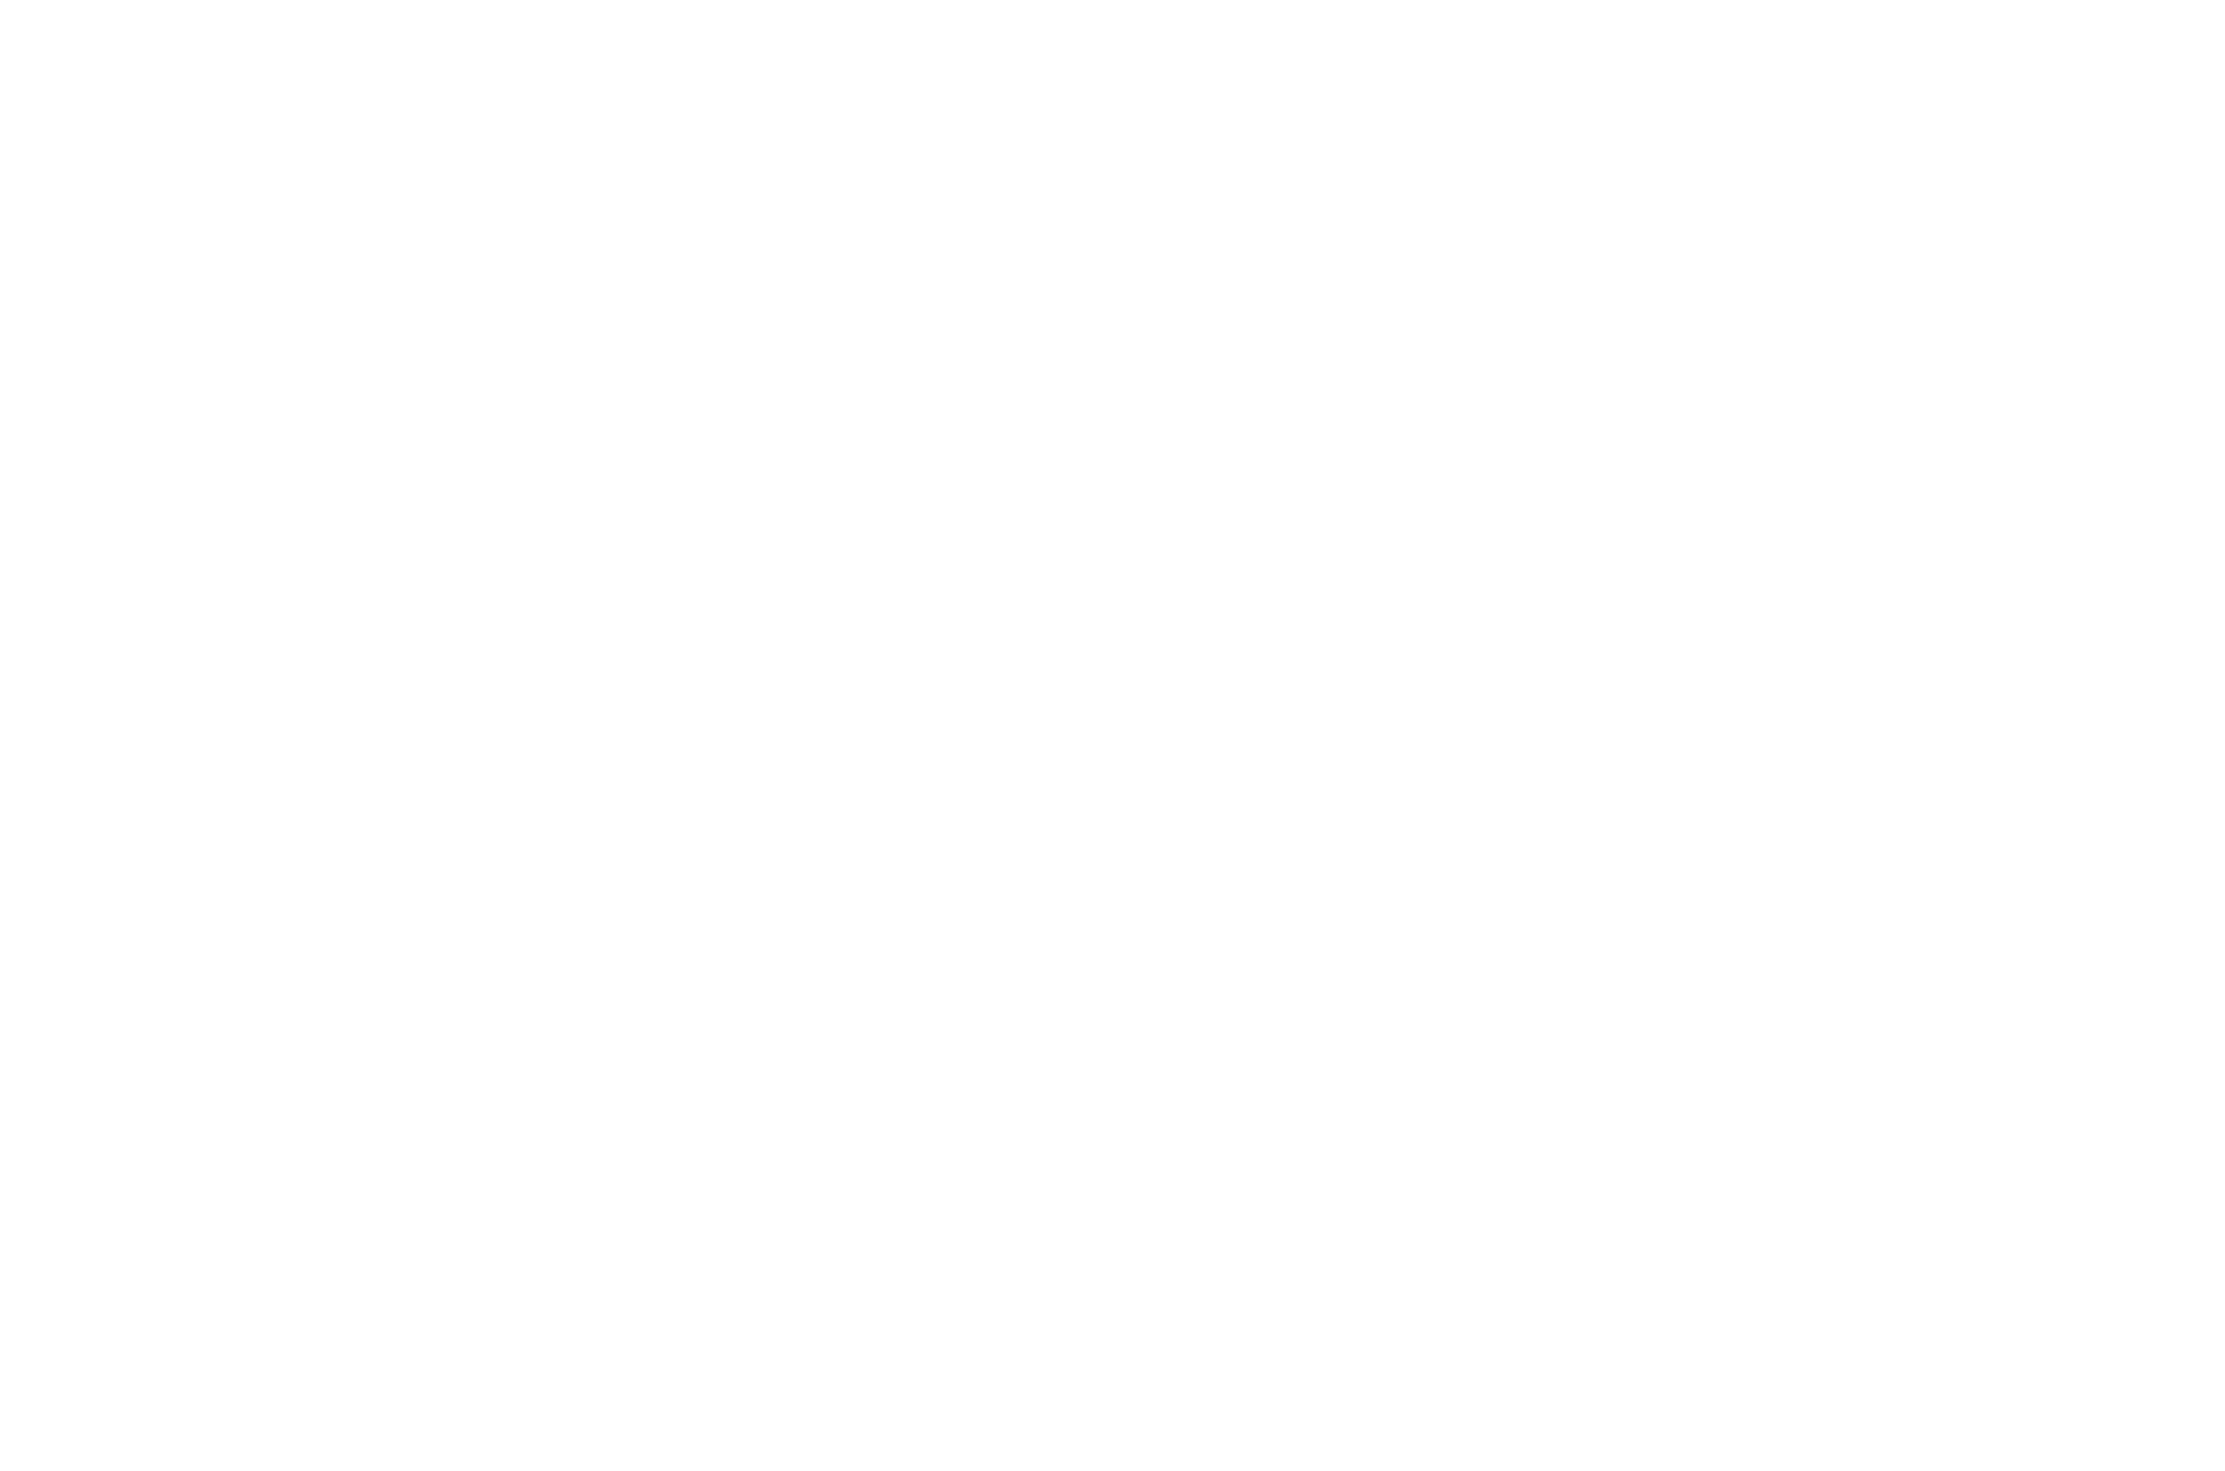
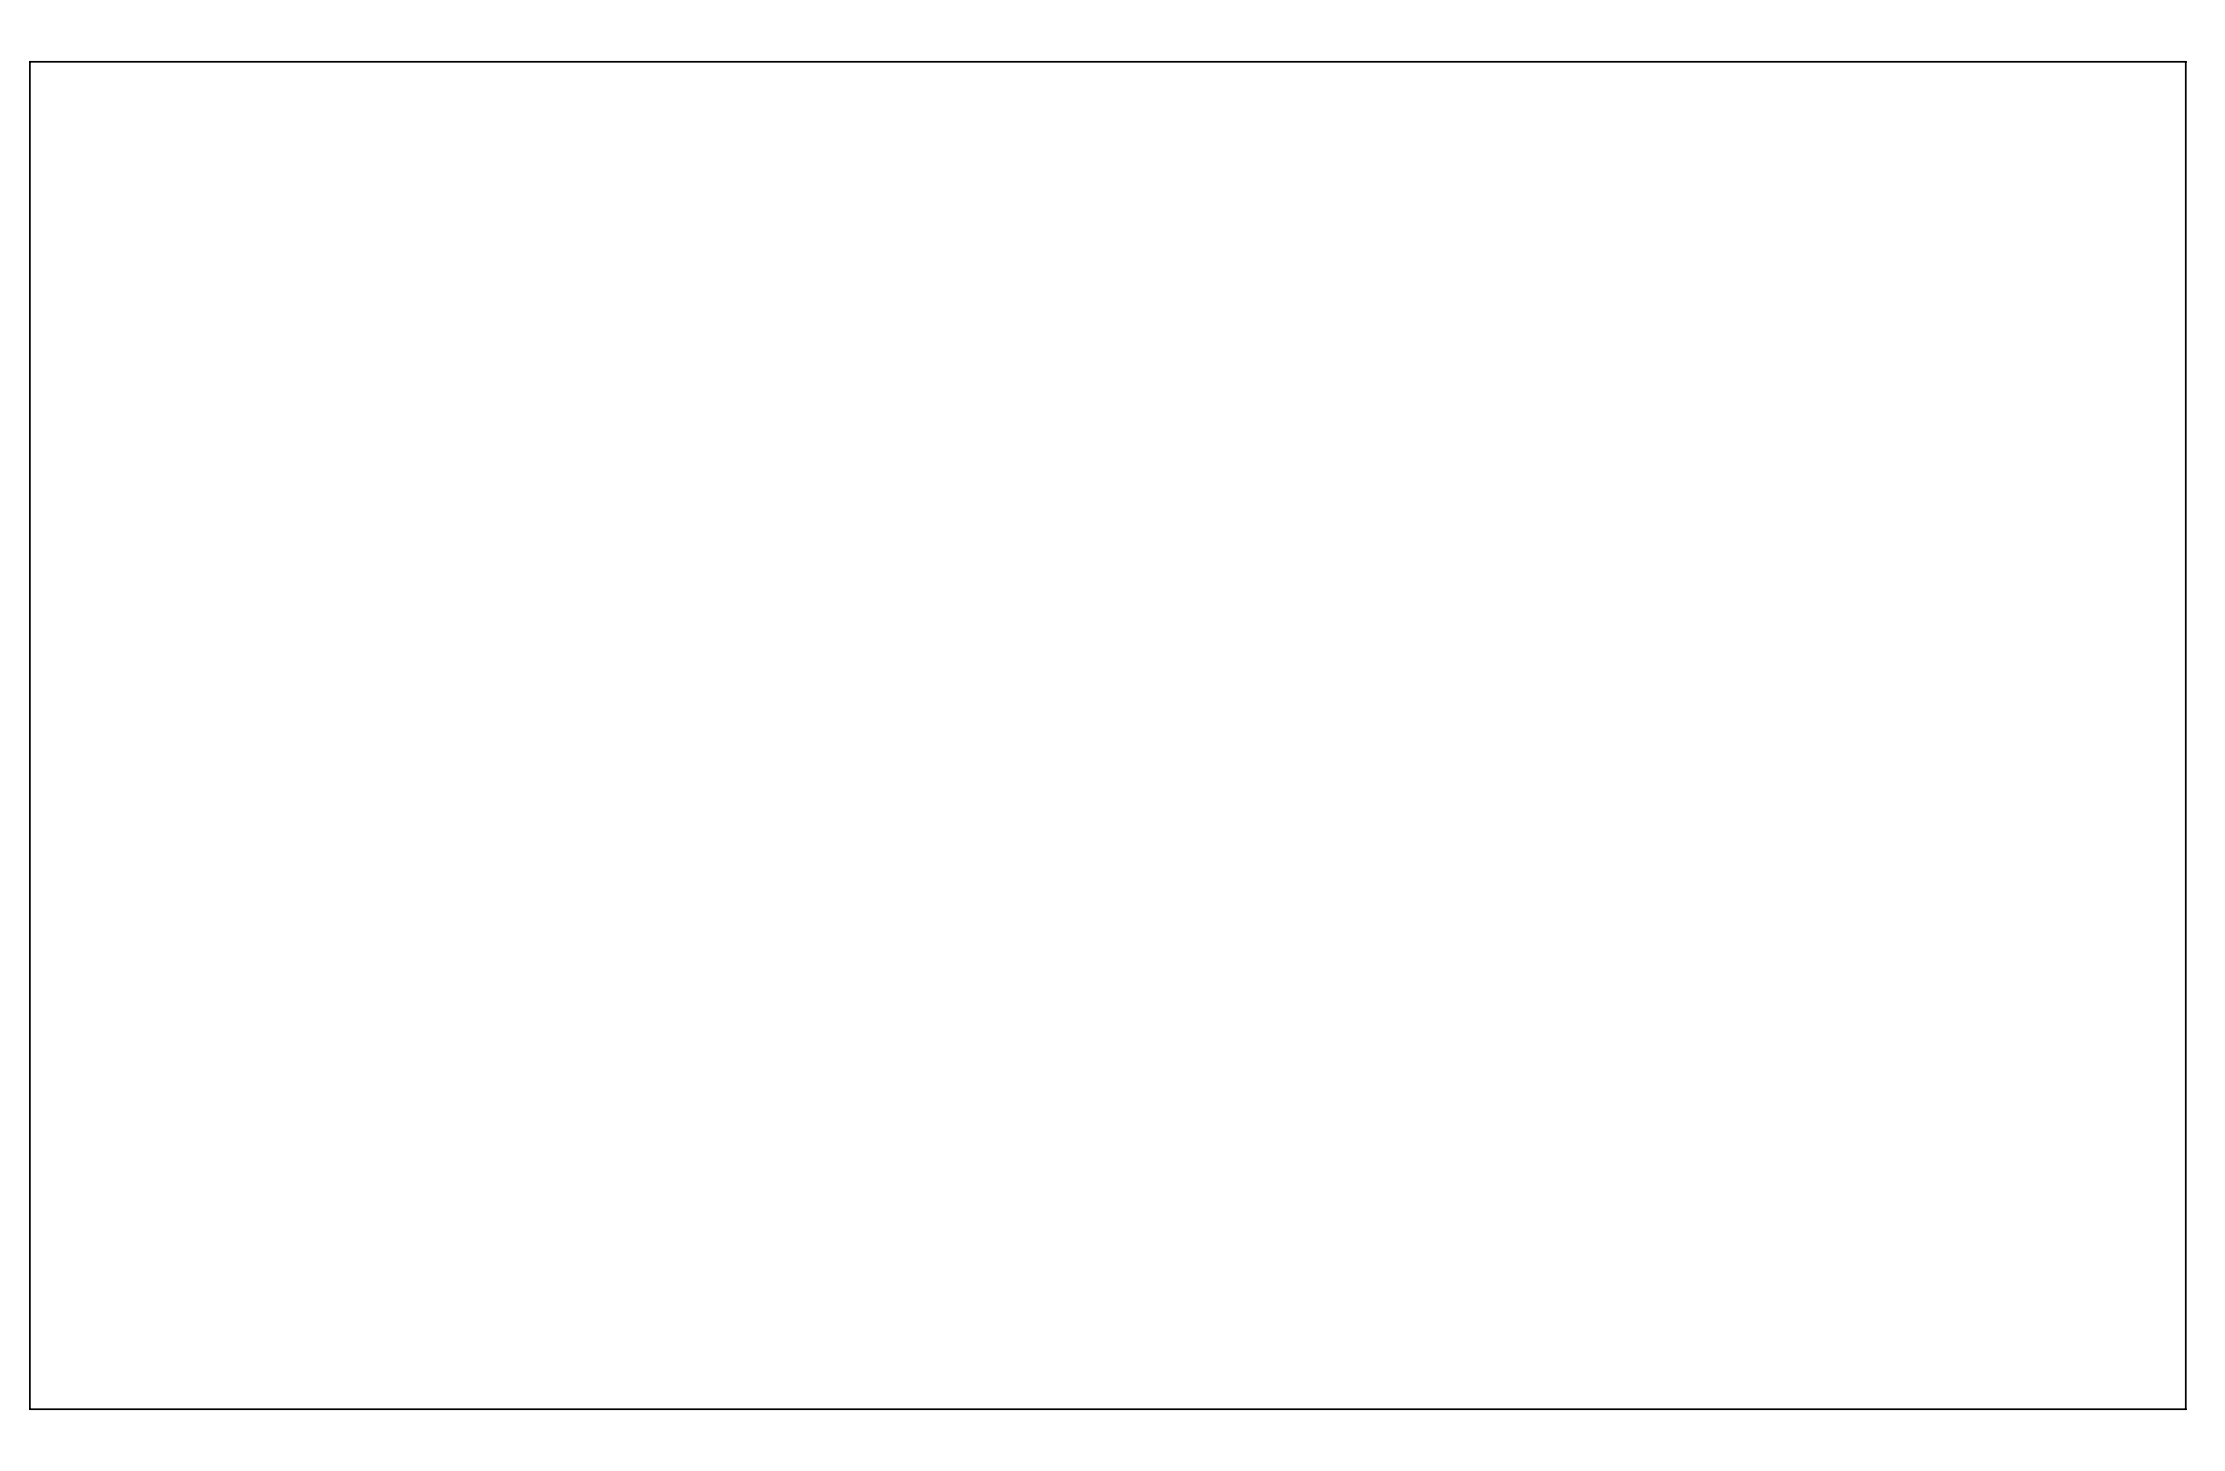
board edge: none -> (2185, 61) (29, 61) (29, 1409) (2185, 1409) (2185, 61)

